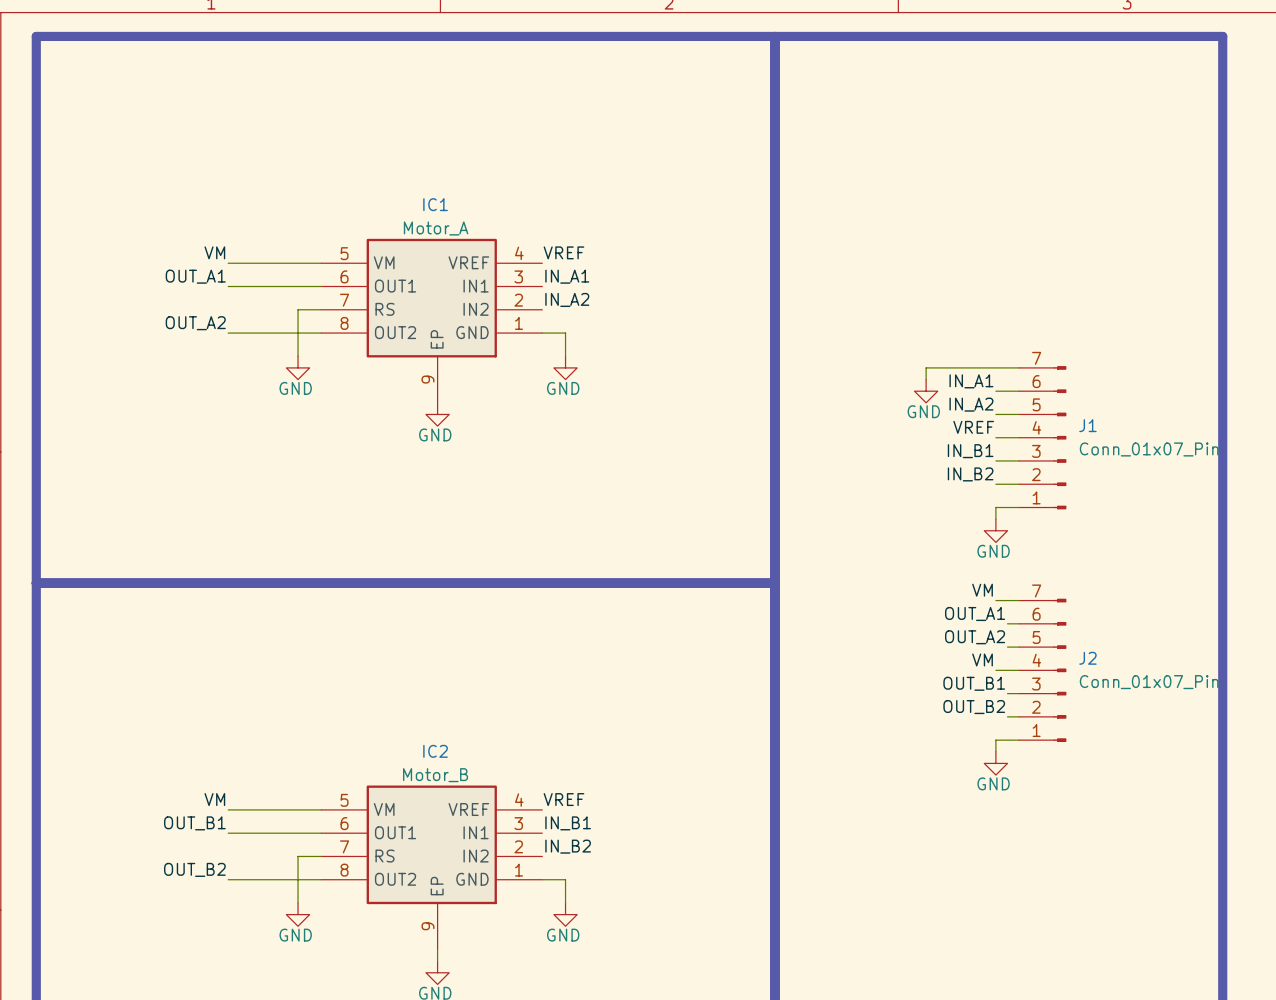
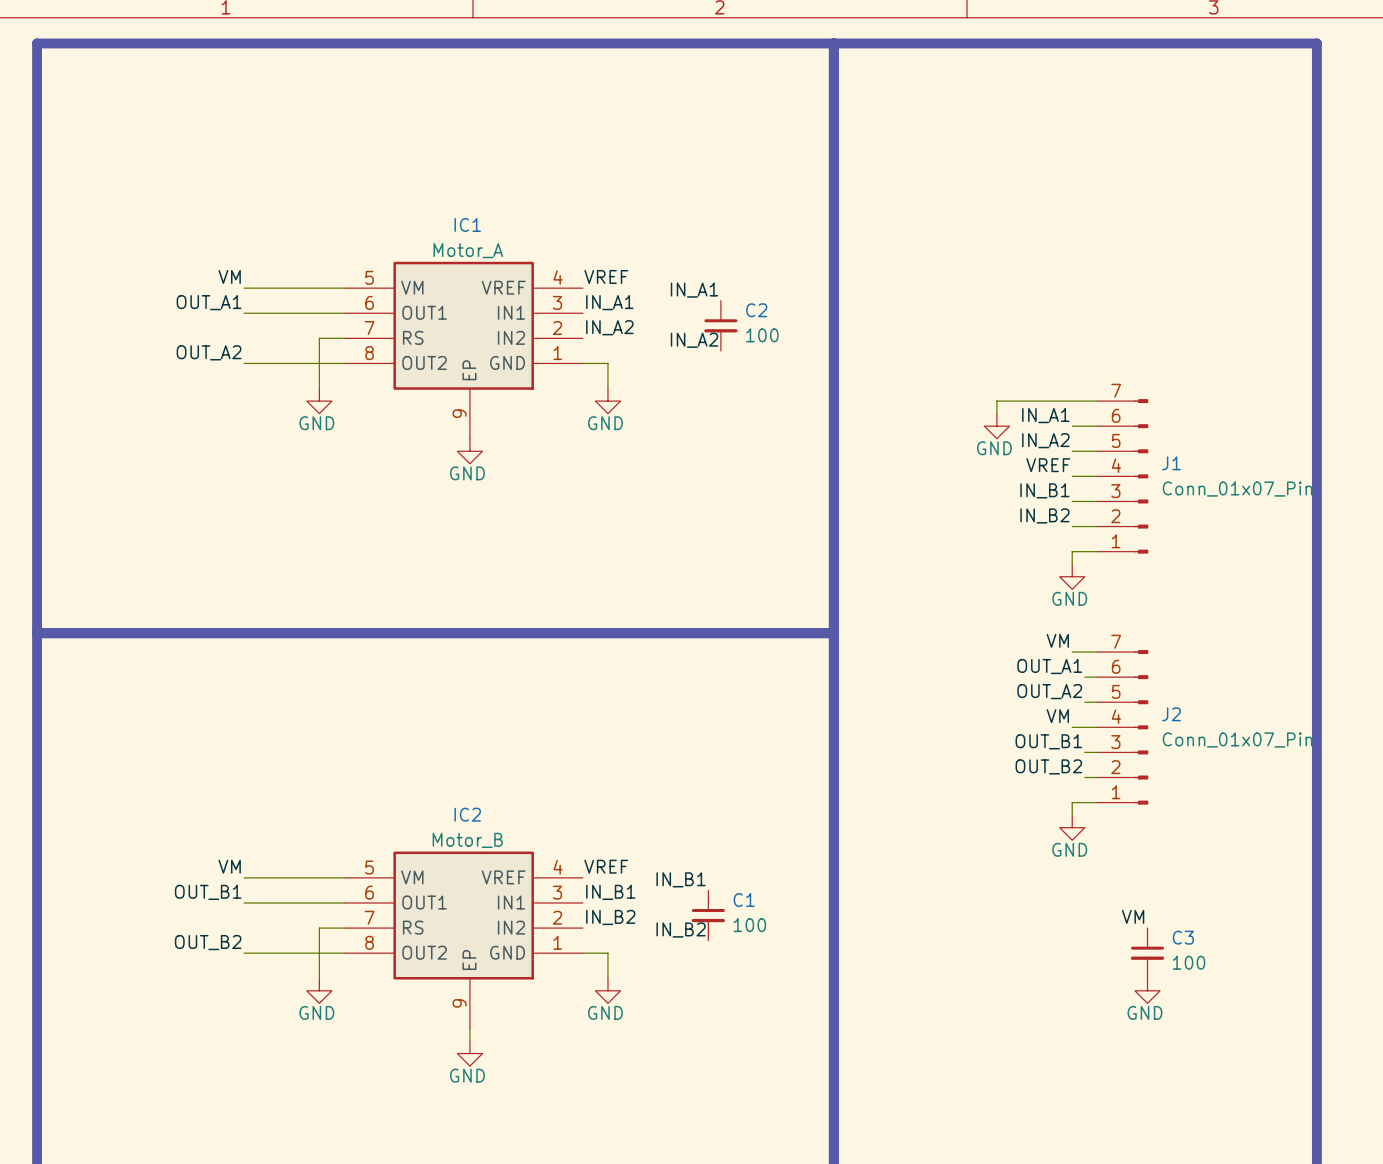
label: none -> IN_A1 (694, 290)
C2: none -> 100 (720, 325)
label: none -> IN_A2 (694, 340)
label: none -> IN_B1 (681, 879)
C1: none -> 100 (708, 915)
label: none -> VM (1133, 916)
label: none -> IN_B2 (681, 930)
C3: none -> 100 (1147, 953)
power symbol: none -> GND (1147, 990)

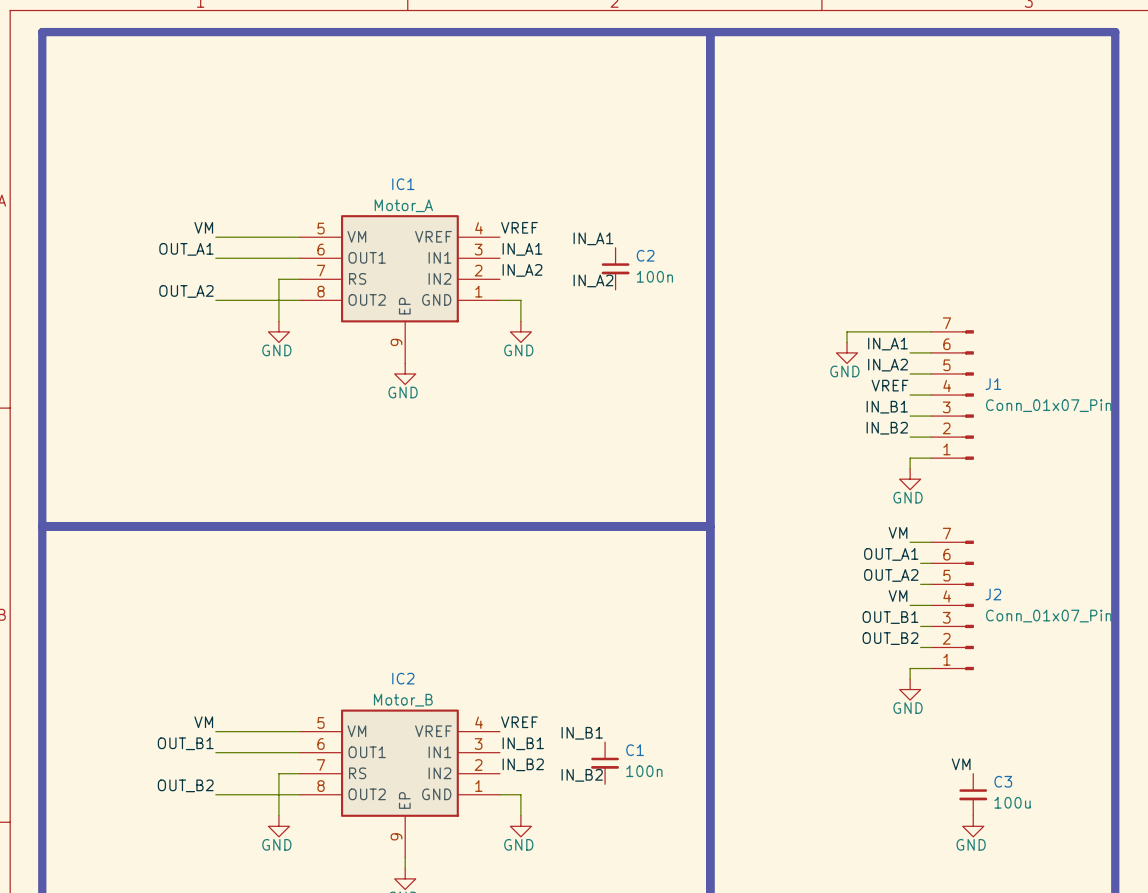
C2 value: 100 (762, 335) -> 100n (654, 276)
C1 value: 100 (749, 925) -> 100n (644, 771)
C3 value: 100 (1189, 962) -> 100u (1012, 802)

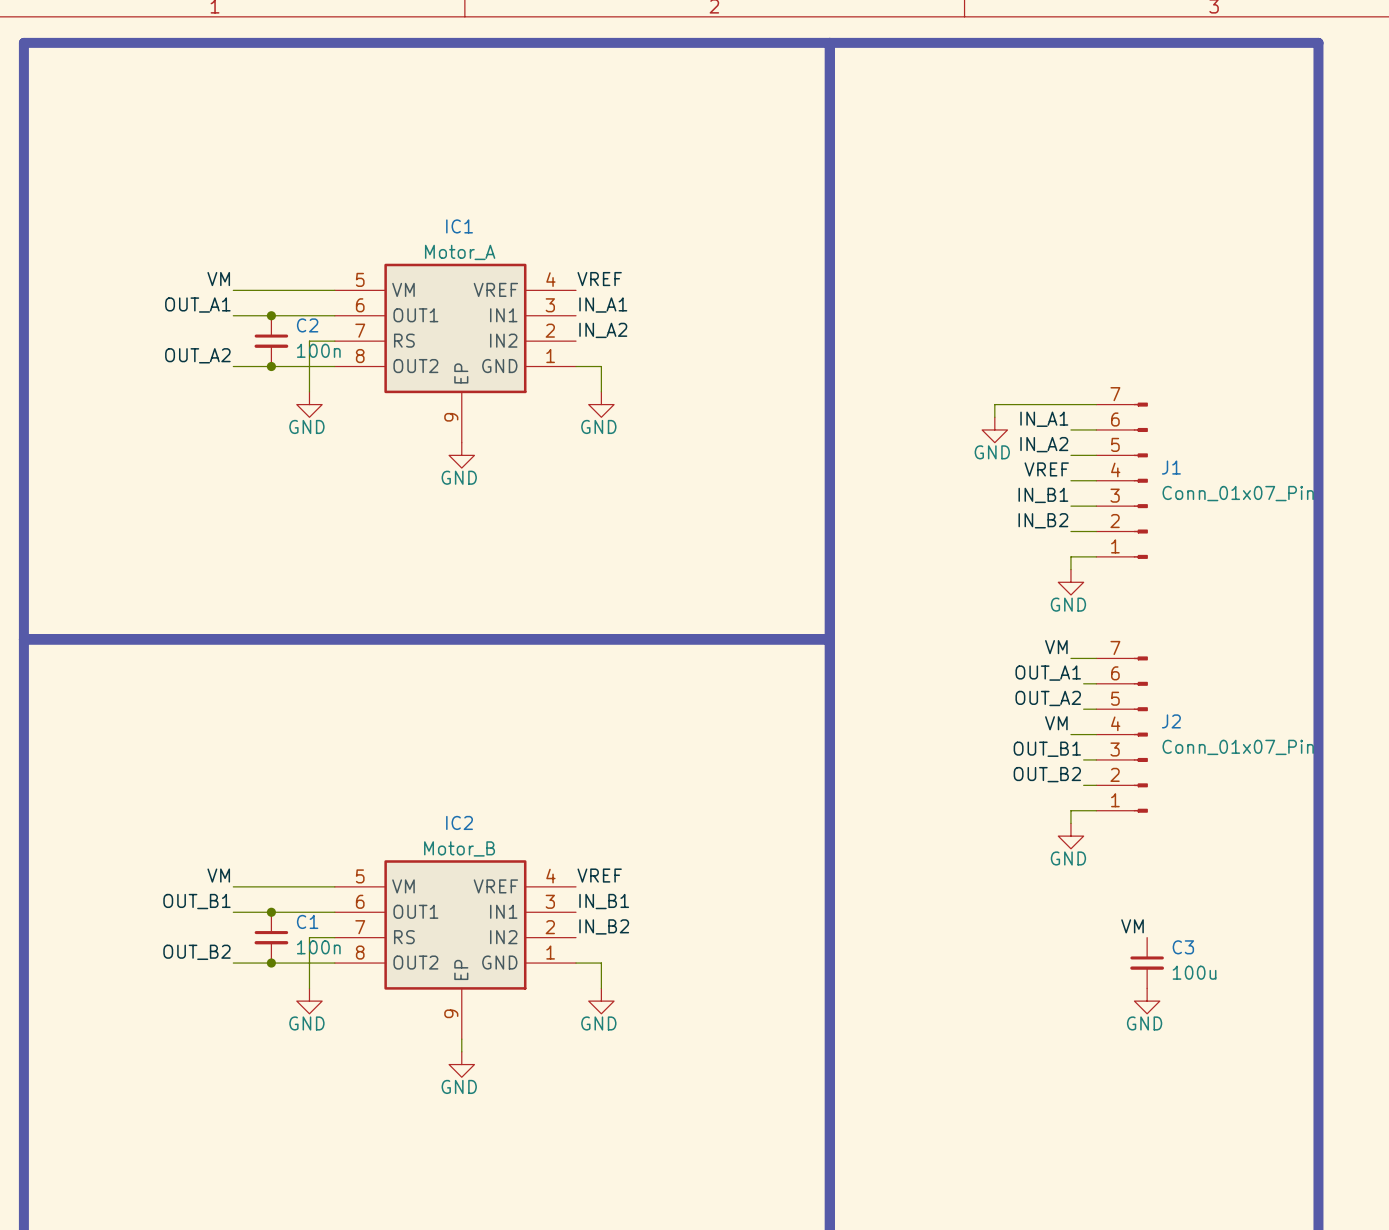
label: IN_A1 (593, 238) -> none
junction: none -> (271, 315)
C2 position: (615, 268) -> (271, 341)
label: IN_A2 (593, 280) -> none
junction: none -> (271, 366)
label: IN_B1 (582, 733) -> none
junction: none -> (271, 912)
C1 position: (605, 763) -> (271, 937)
label: IN_B2 (582, 775) -> none
junction: none -> (271, 963)

